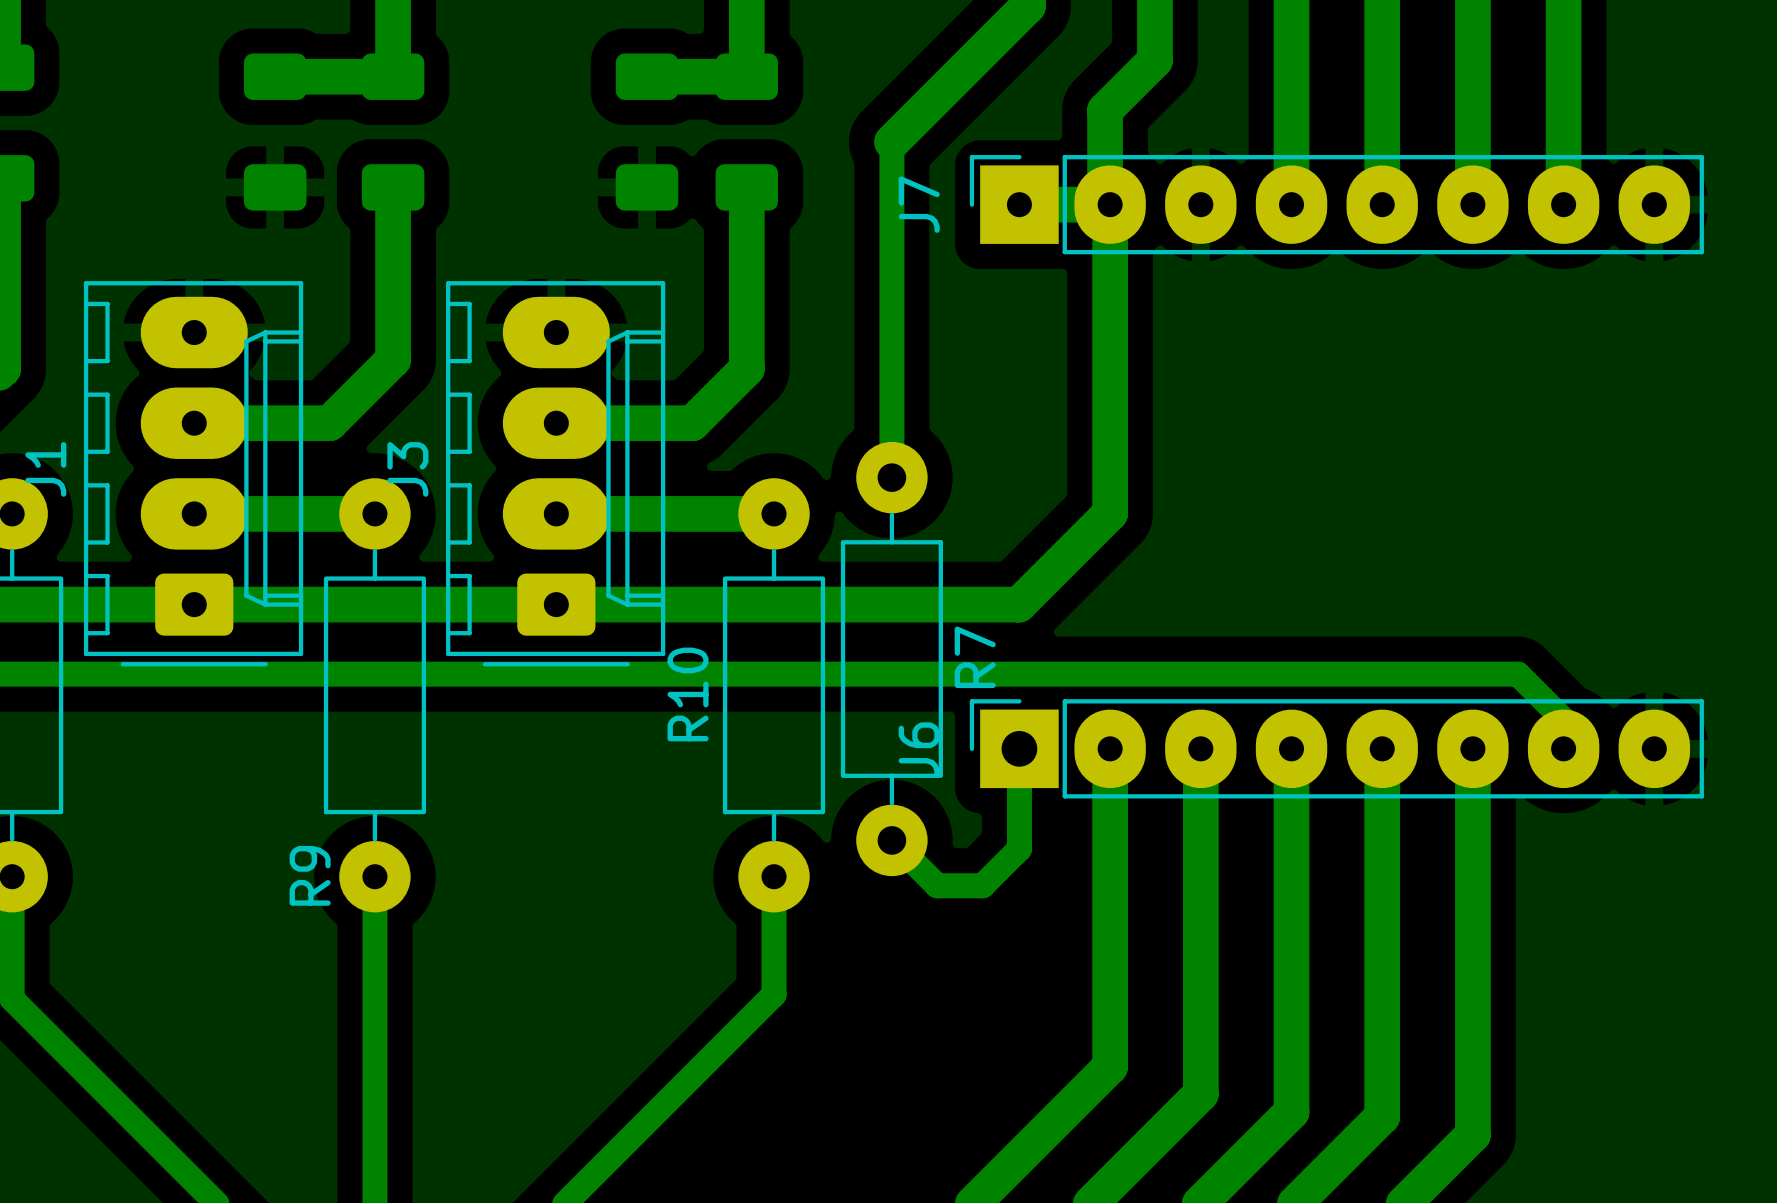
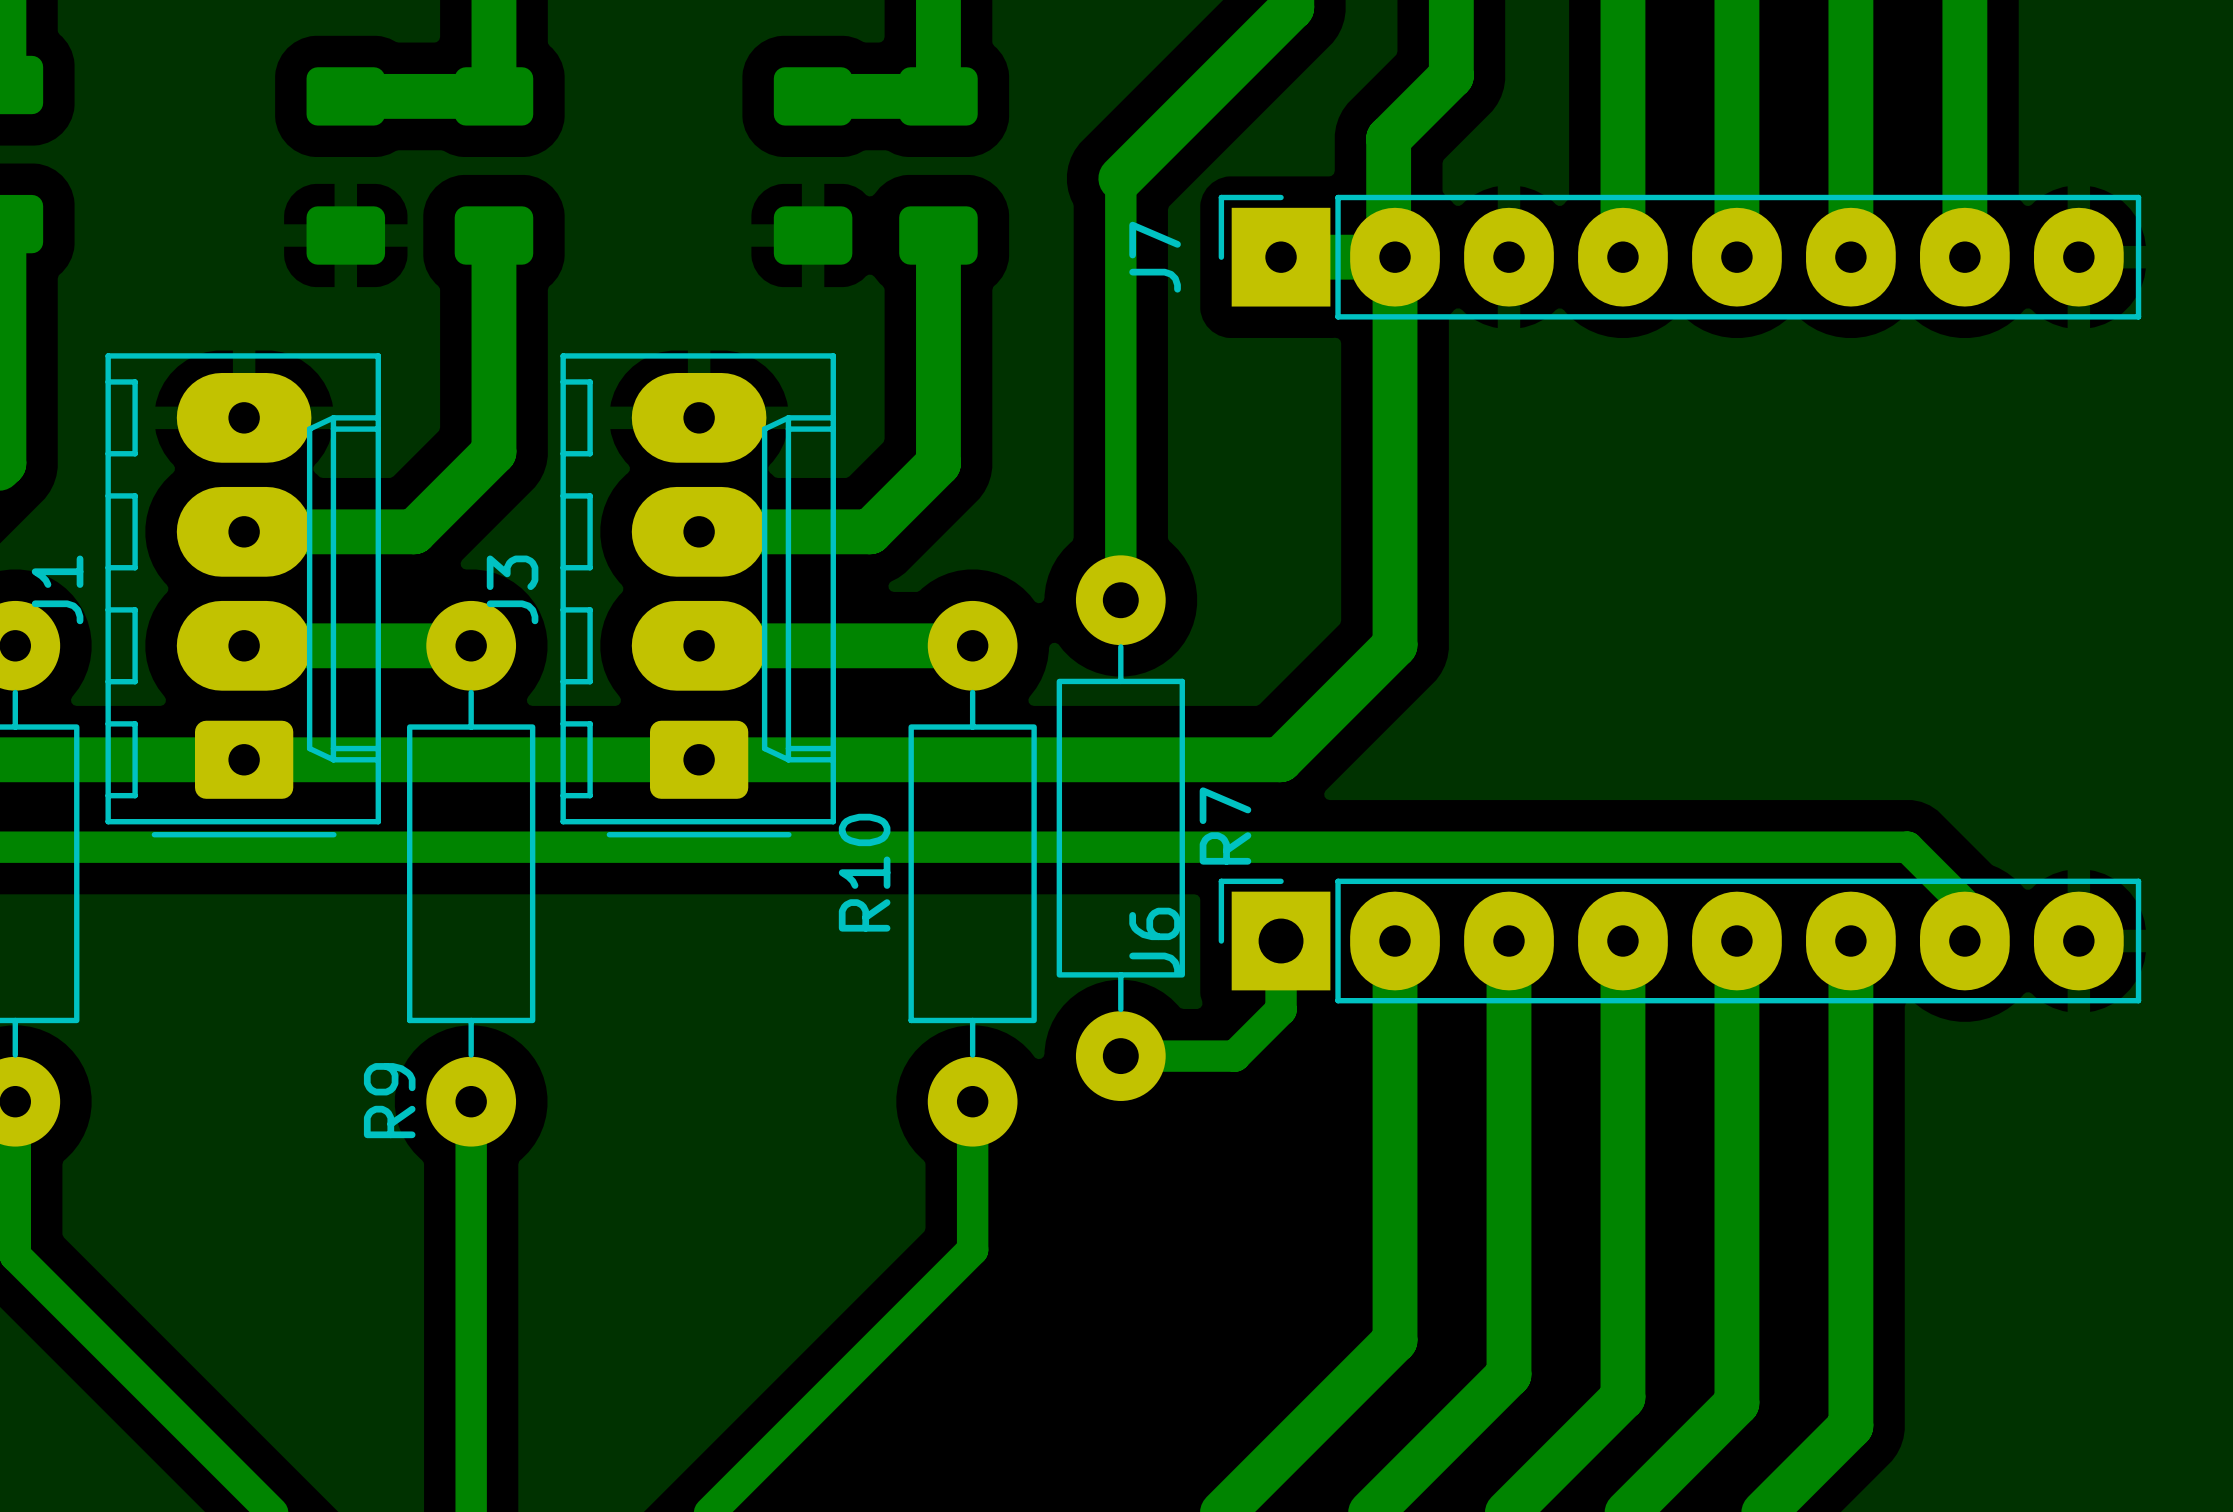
bottom track: (1019, 803) (1019, 848) (982, 885) (937, 885) (891, 840) -> (1281, 1009) (1234, 1056) (1120, 1056)

